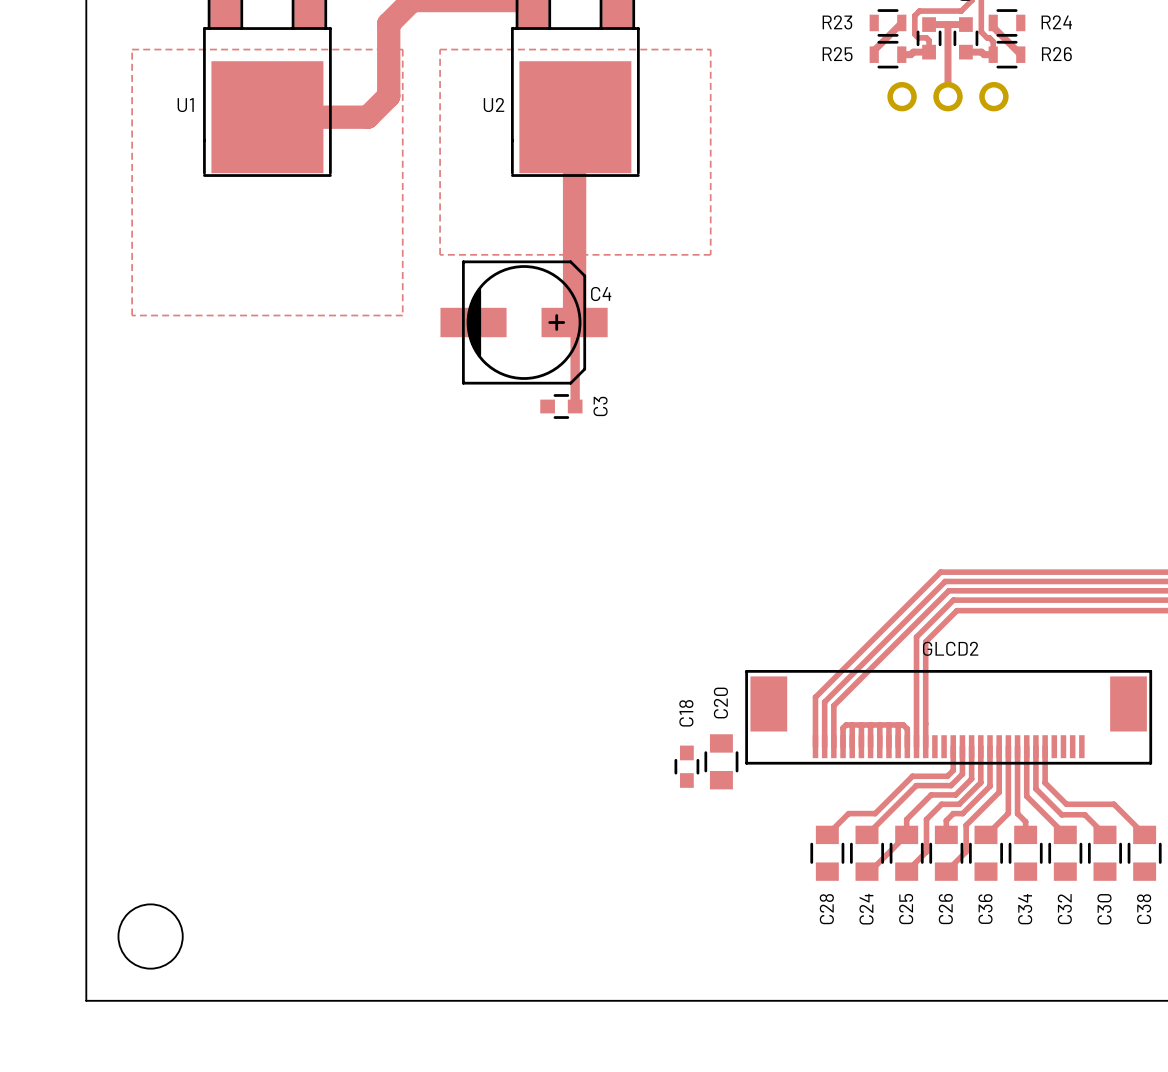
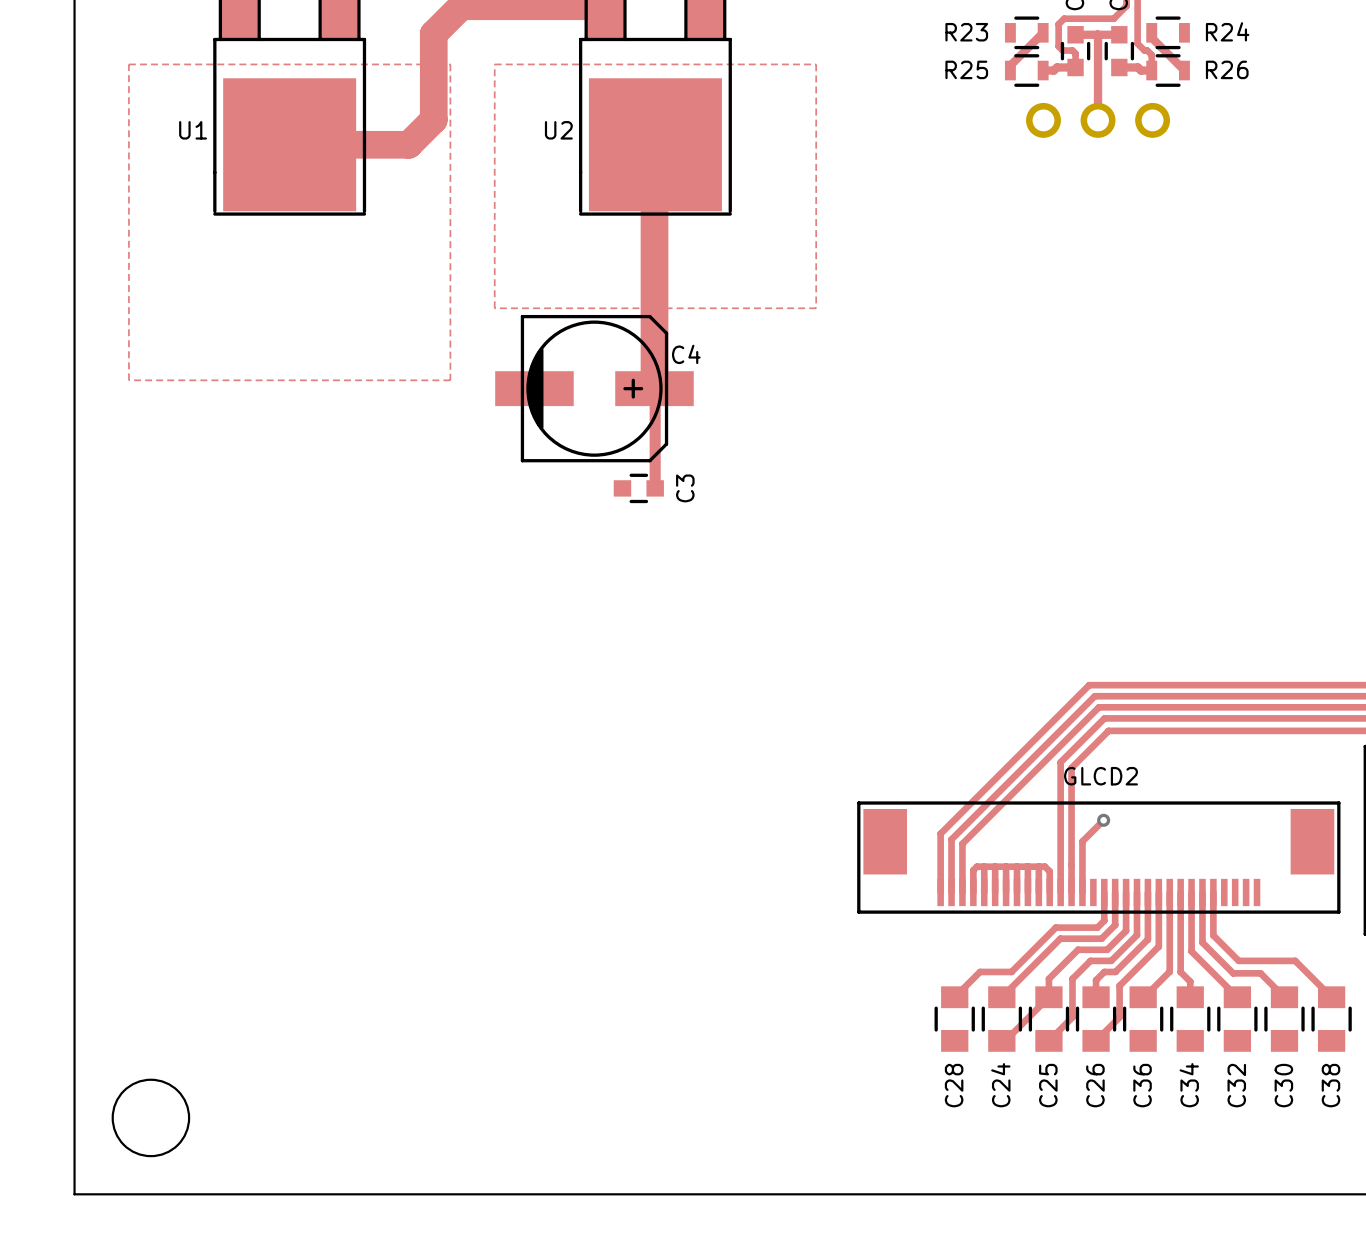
track: none -> (1103, 820) (1082, 841) (1082, 892)
via: none -> (1103, 820)
C20: (721, 761) -> none
C18: (686, 766) -> none

